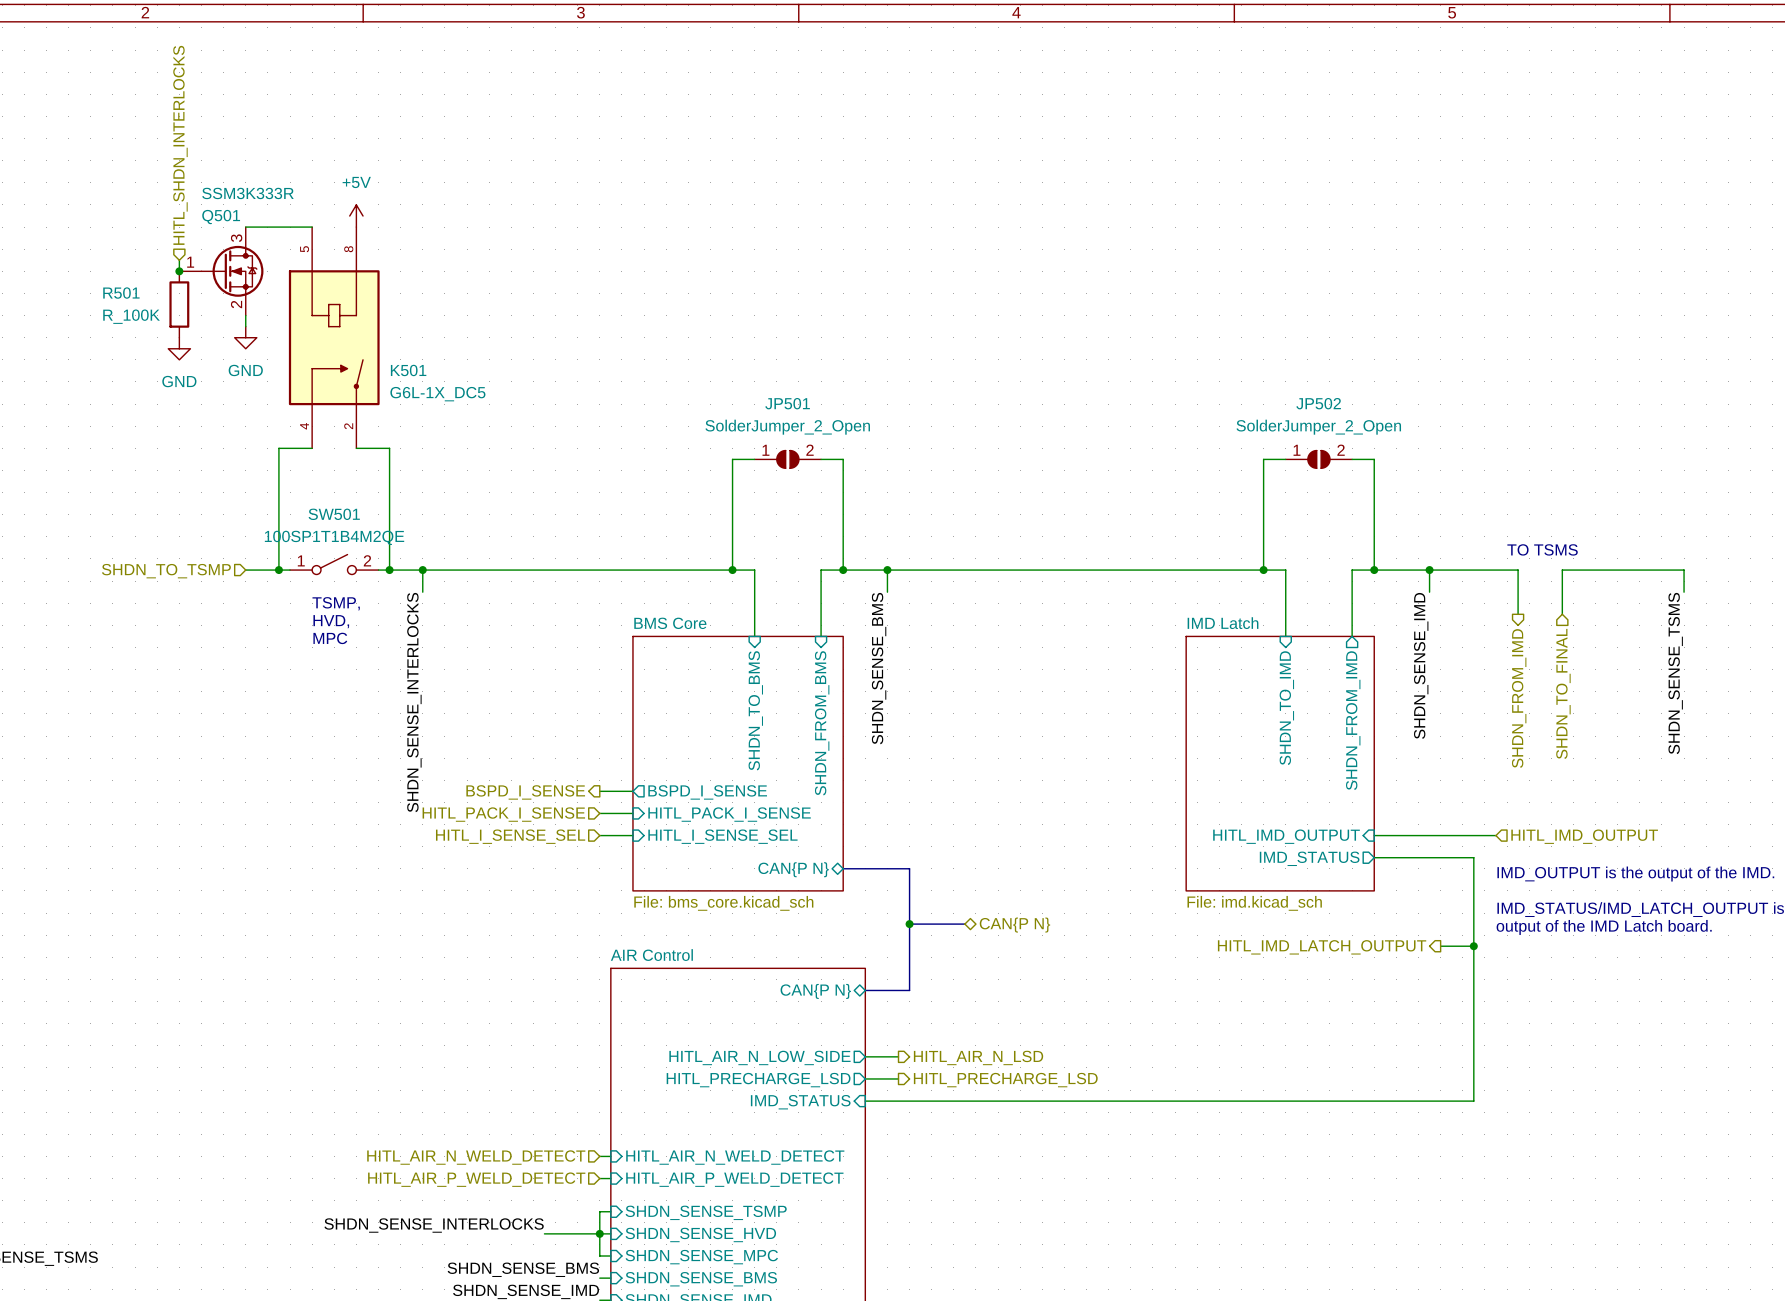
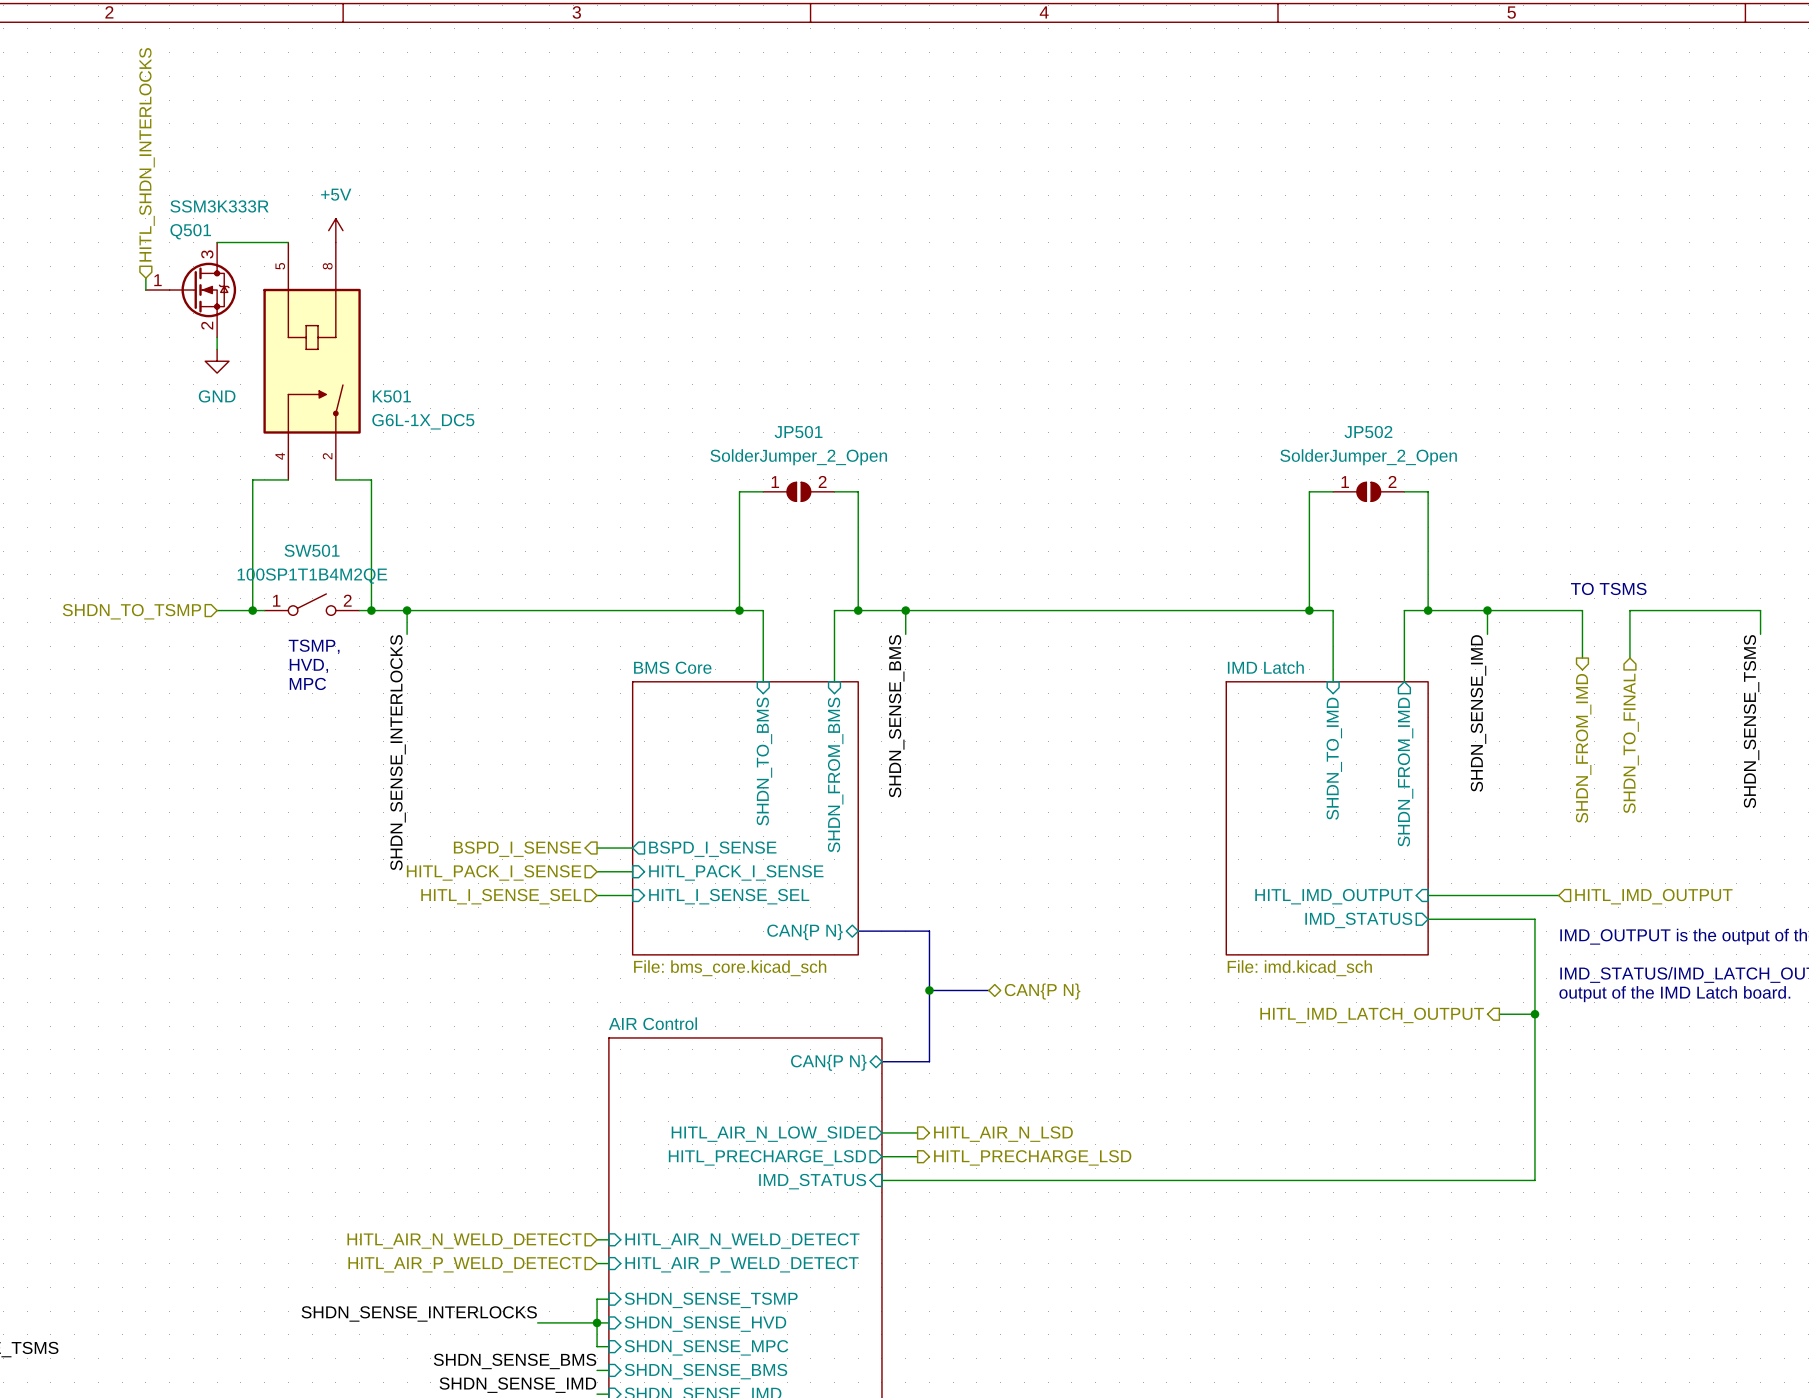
junction: (179, 271) -> none
R501: R_100K (179, 304) -> none
power symbol: GND (179, 348) -> none

